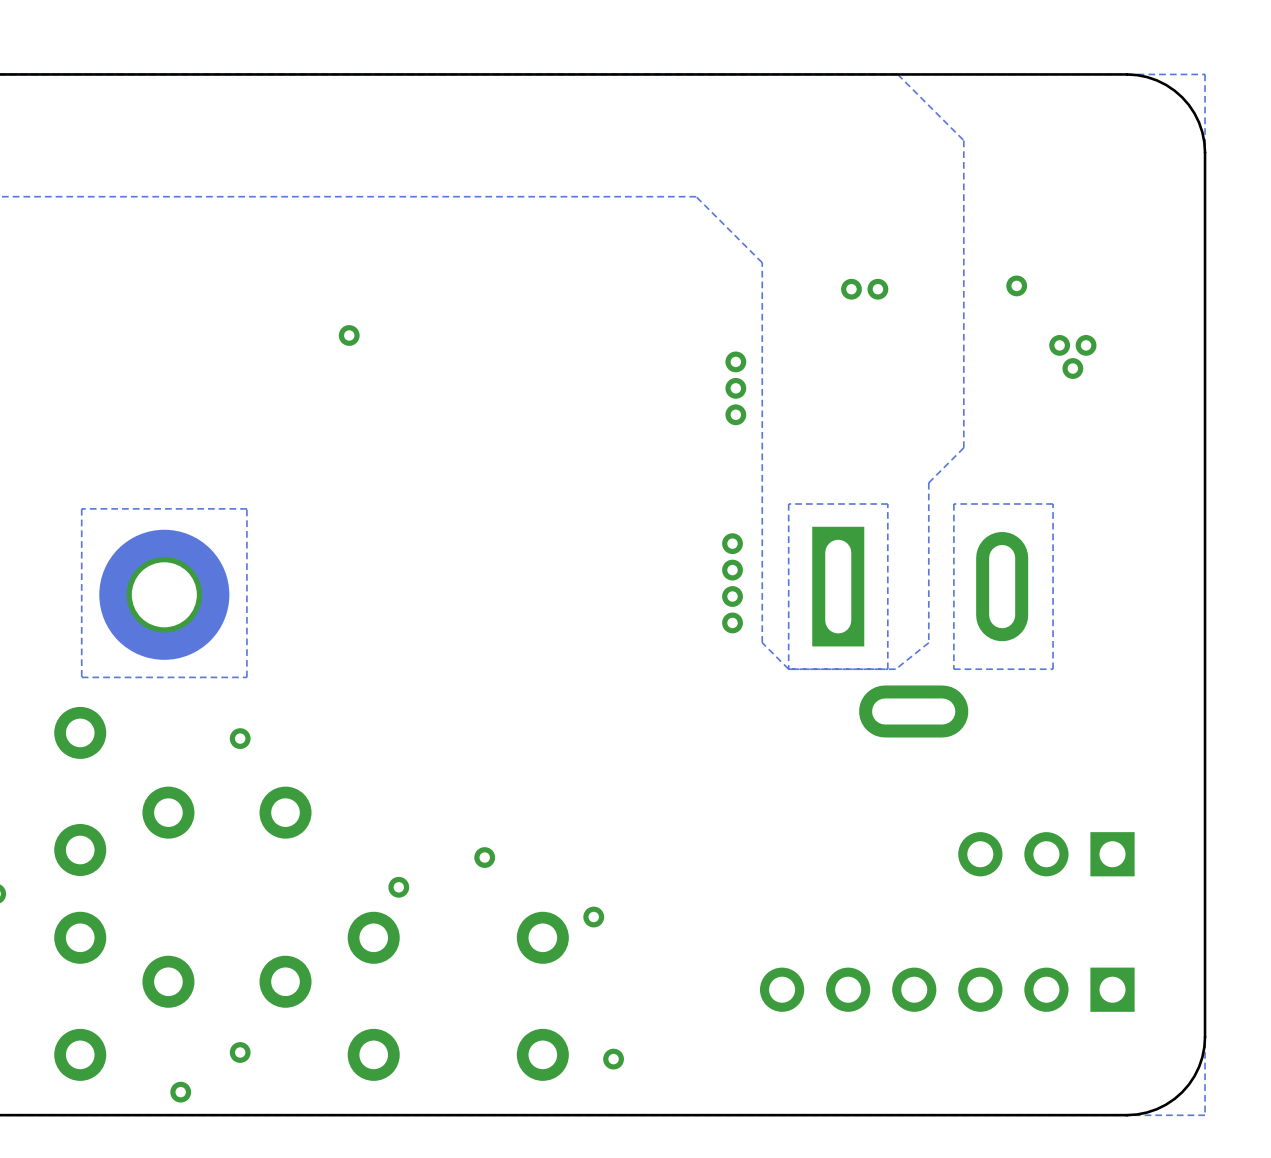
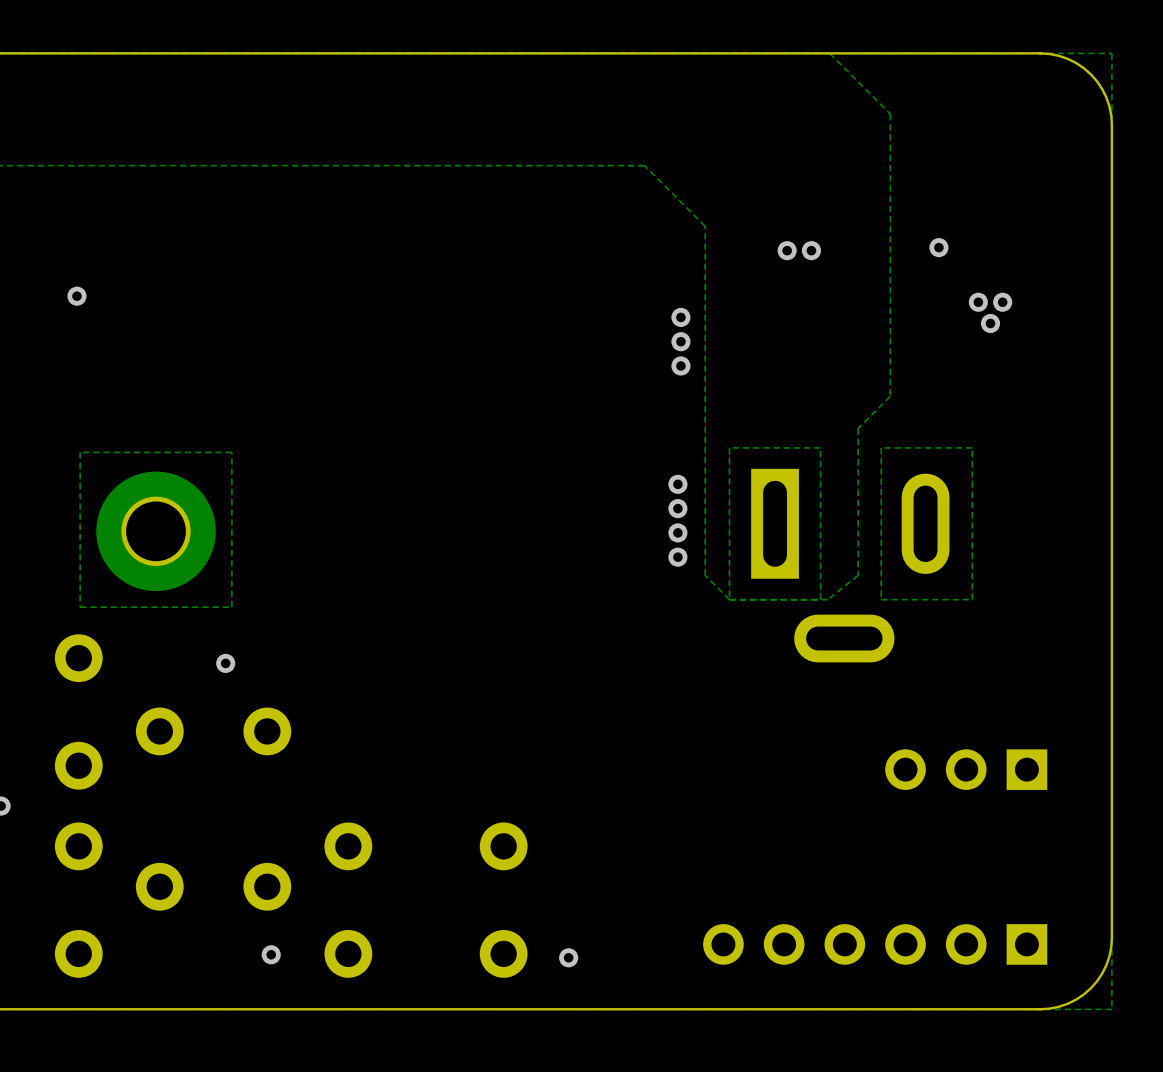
via: (349, 335) -> none
via: none -> (76, 296)
via: (484, 857) -> none
via: (398, 887) -> none
via: (593, 917) -> none
part position: (947, 989) -> (875, 944)
via position: (240, 1052) -> (271, 954)
via: (180, 1092) -> none

